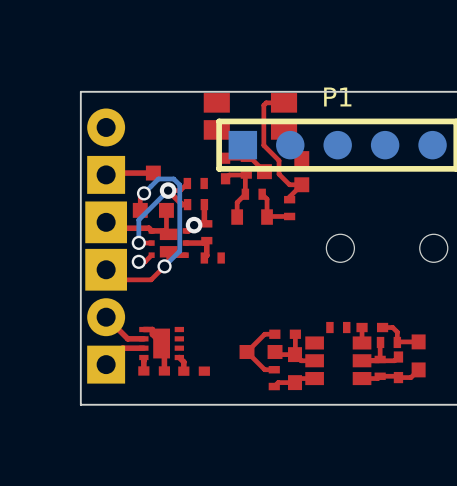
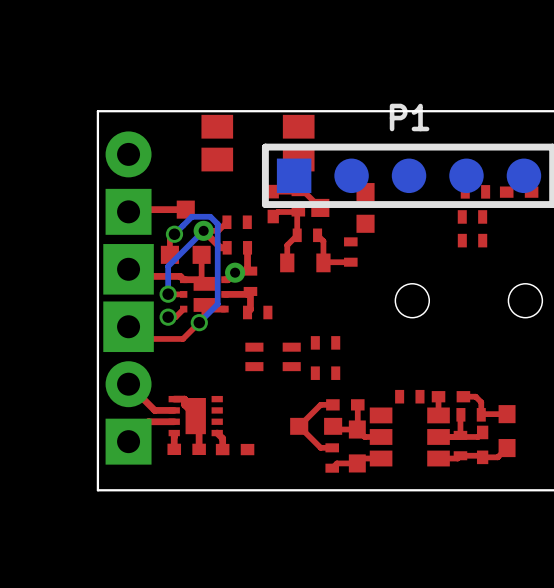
top track: (284, 102) (266, 102) (263, 105) (263, 145) (279, 160) (279, 174) (289, 184) (301, 184) (289, 196) (289, 199) -> none
part position: (250, 116) -> (257, 143)
part: none -> (475, 191)
part: none -> (519, 192)
part: none -> (472, 216)
part: none -> (472, 240)
part: none -> (325, 342)
part: none -> (273, 356)
part: none -> (325, 373)

